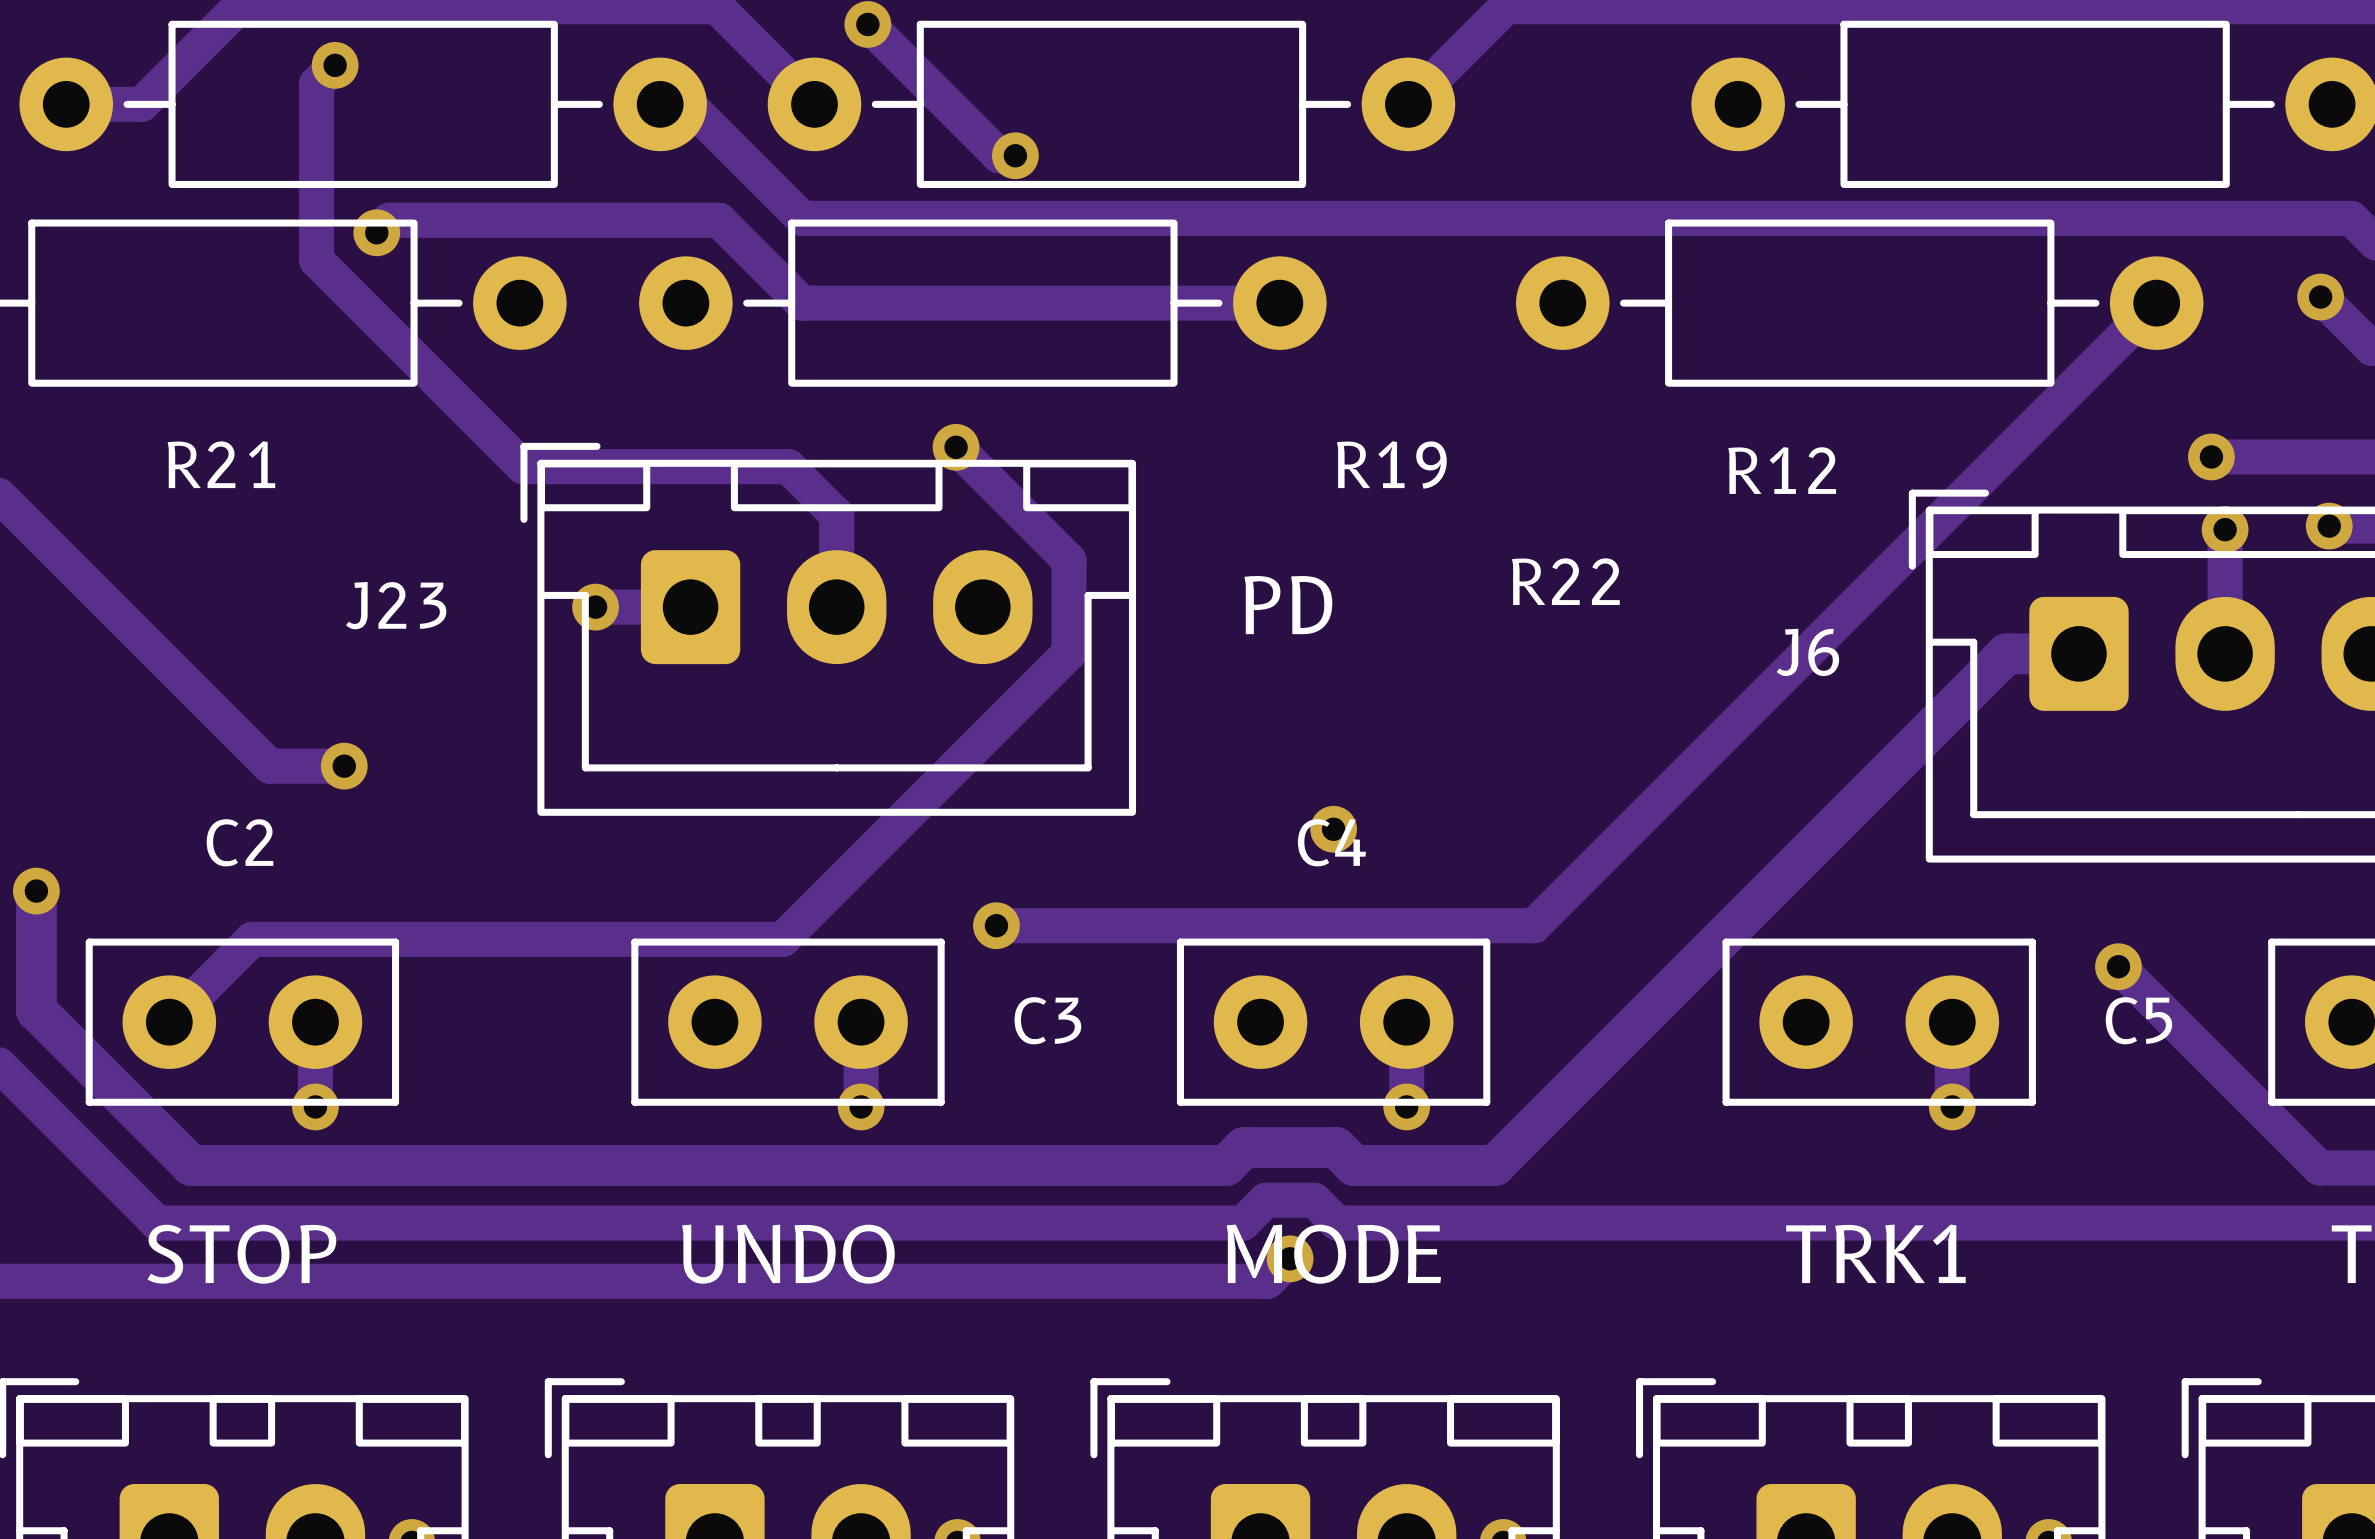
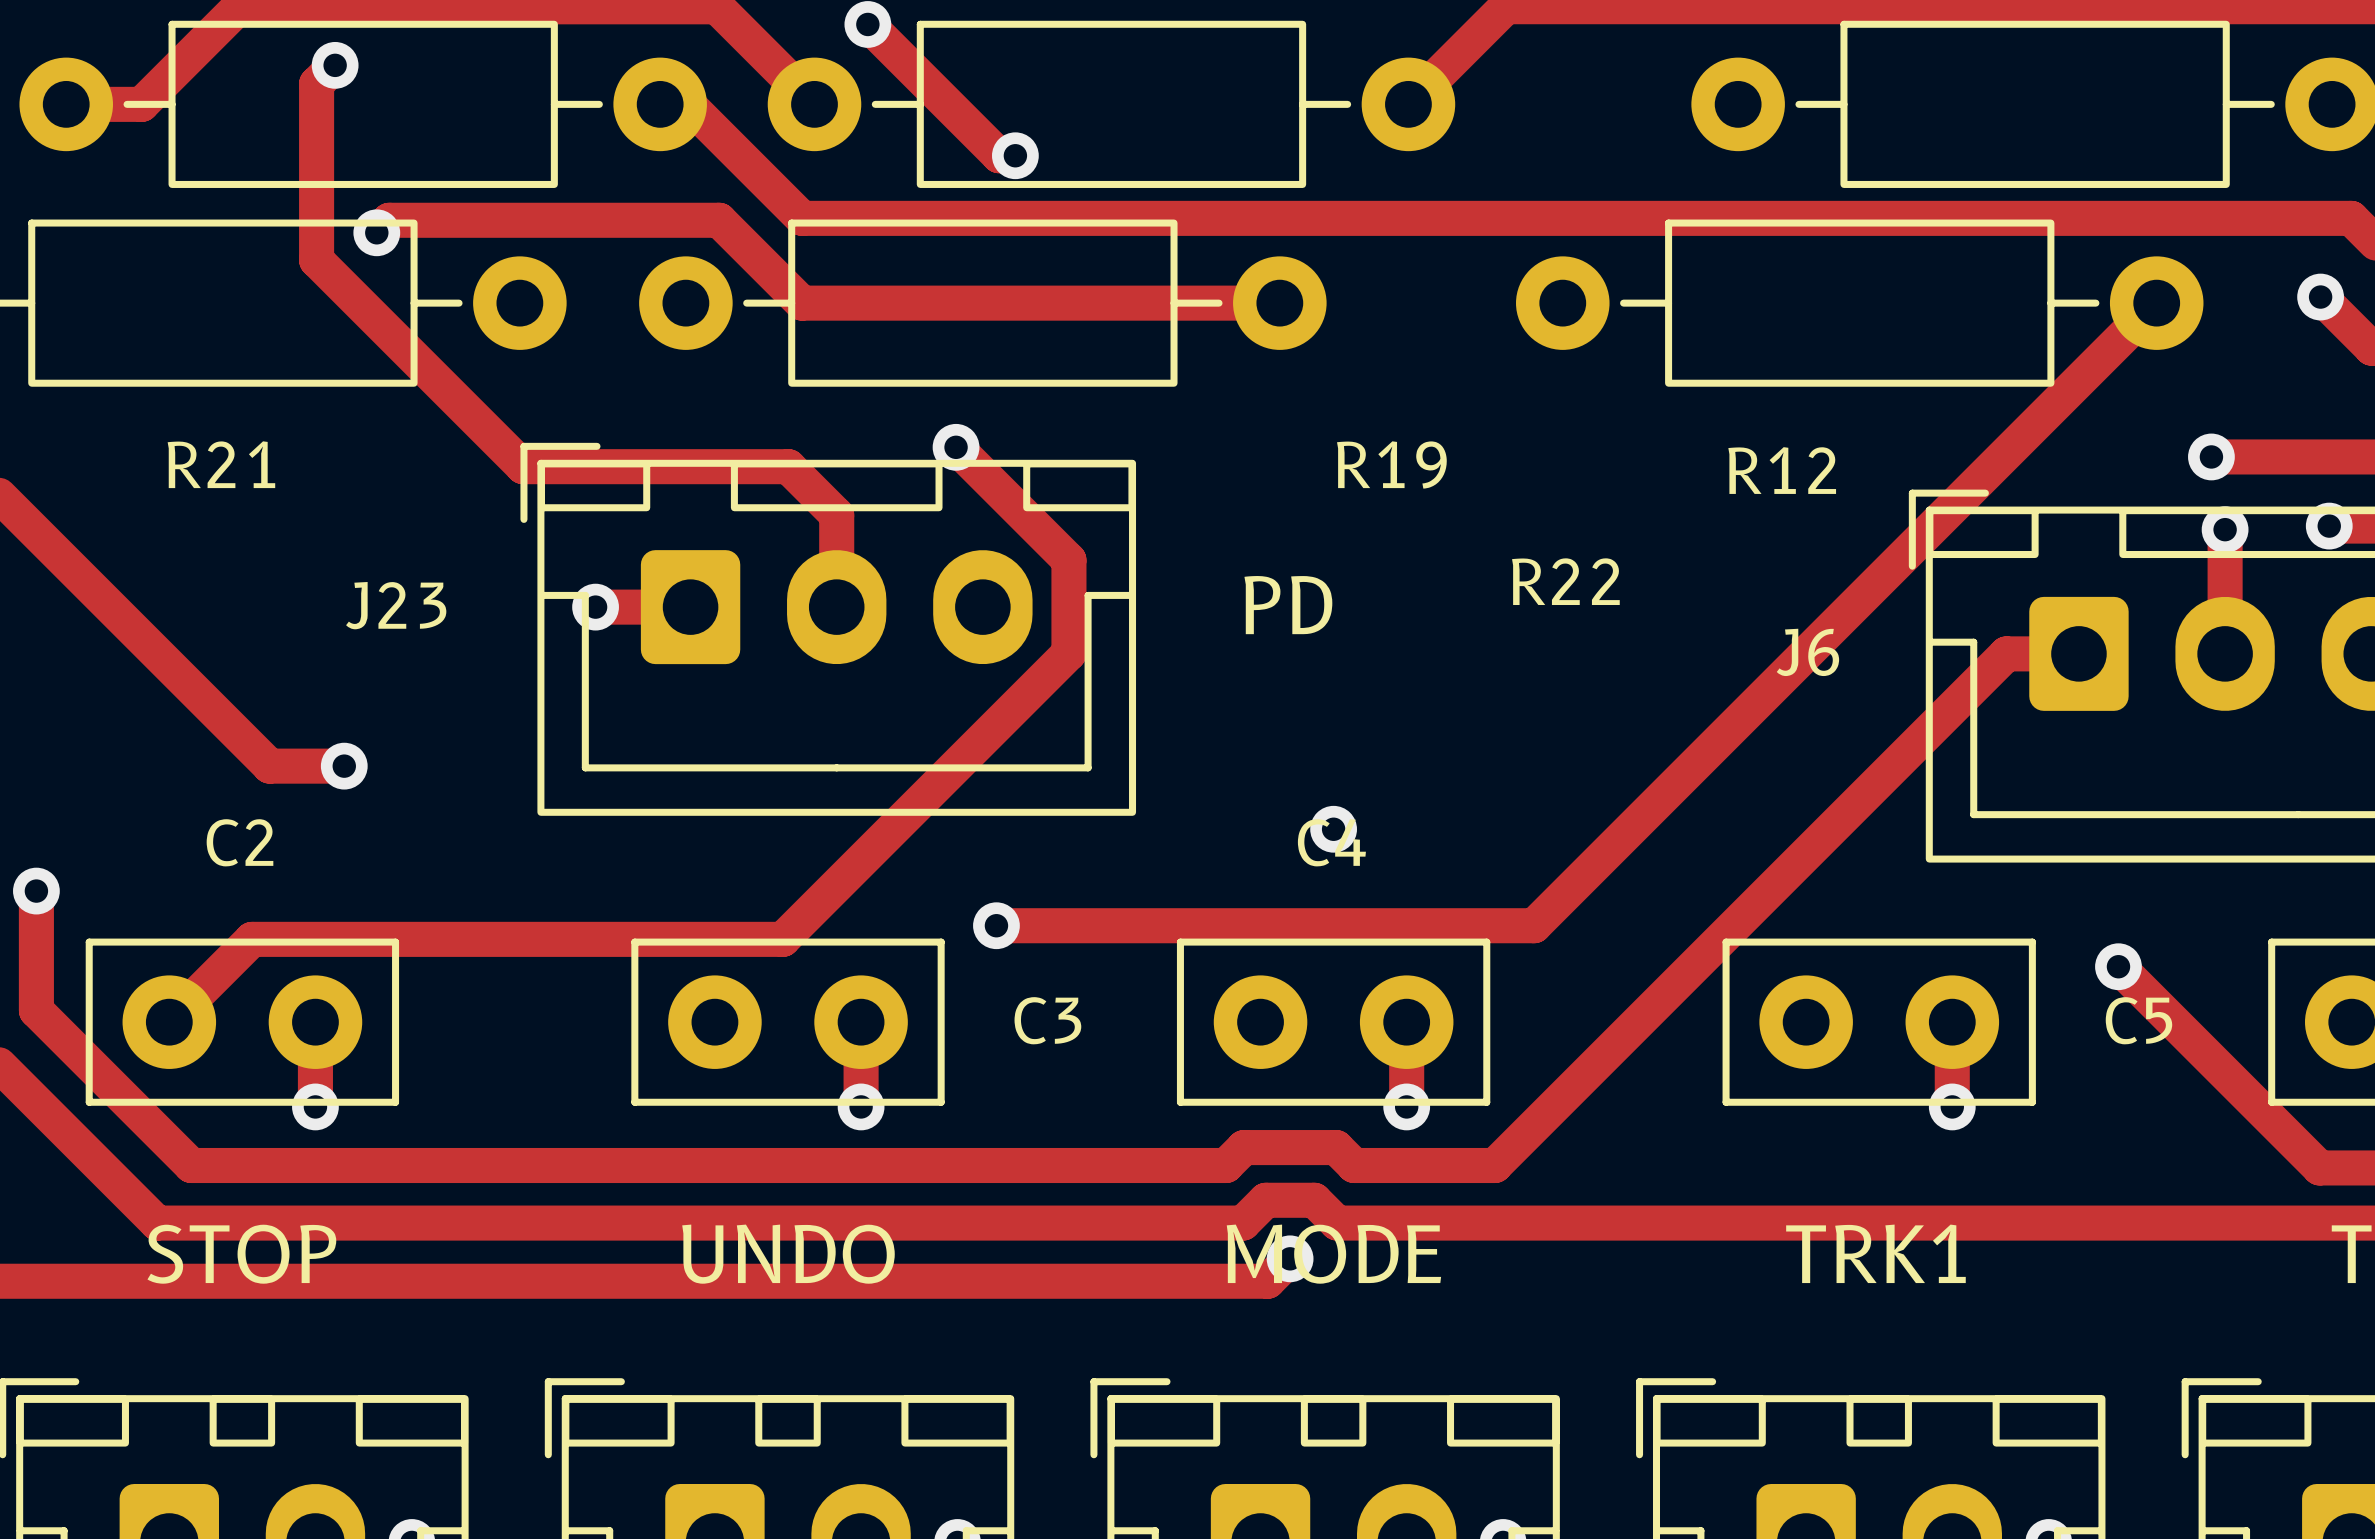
track width: thick (2078, 653) (2006, 653) (1494, 1165) (1354, 1165) (1336, 1147) (1244, 1147) (1226, 1165) (191, 1165) (36, 1010) (36, 891) -> thin (2078, 653) (2006, 653) (1494, 1165) (1354, 1165) (1336, 1147) (1244, 1147) (1226, 1165) (191, 1165) (36, 1010) (36, 891)

